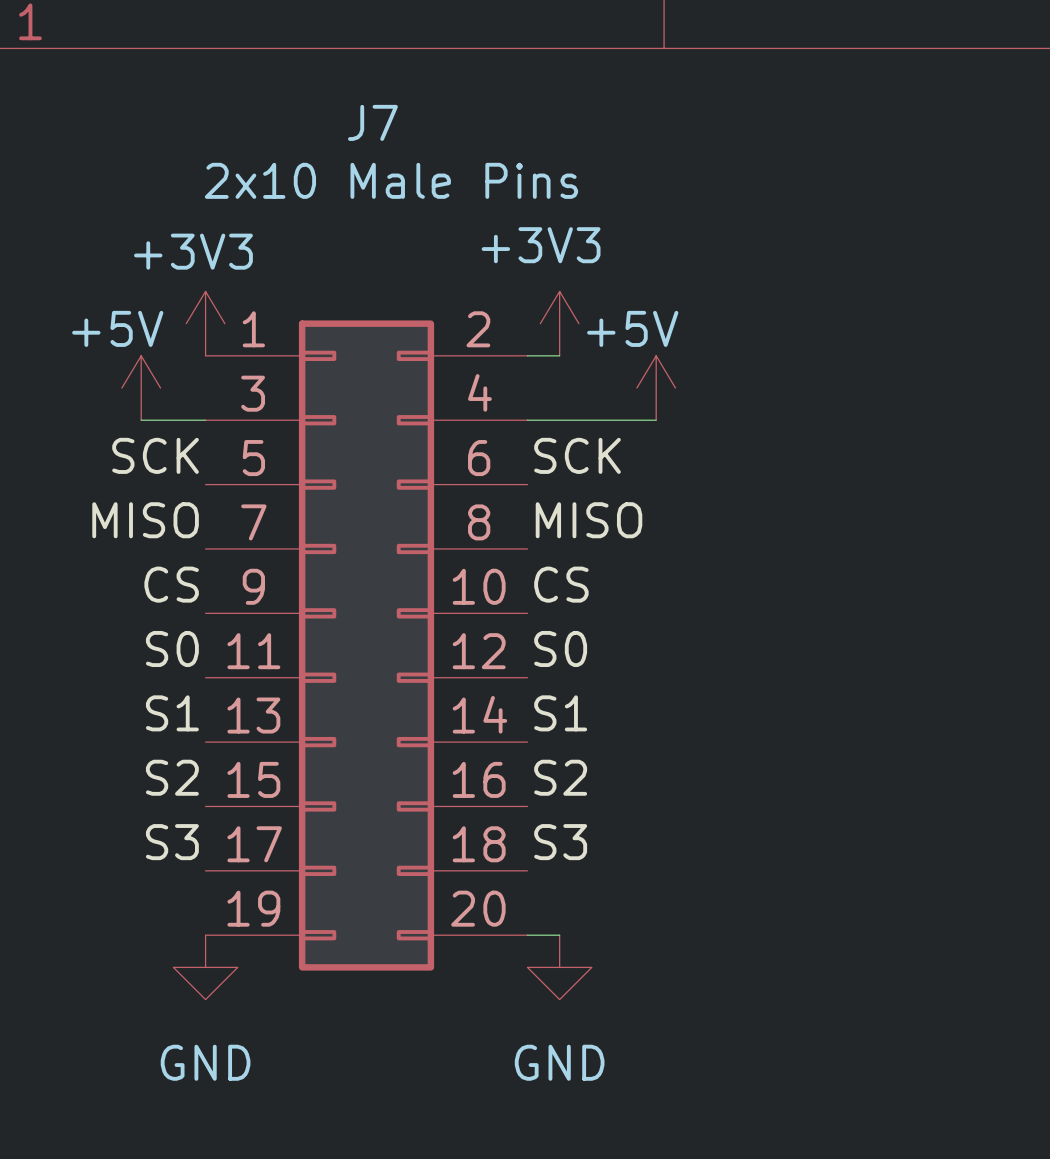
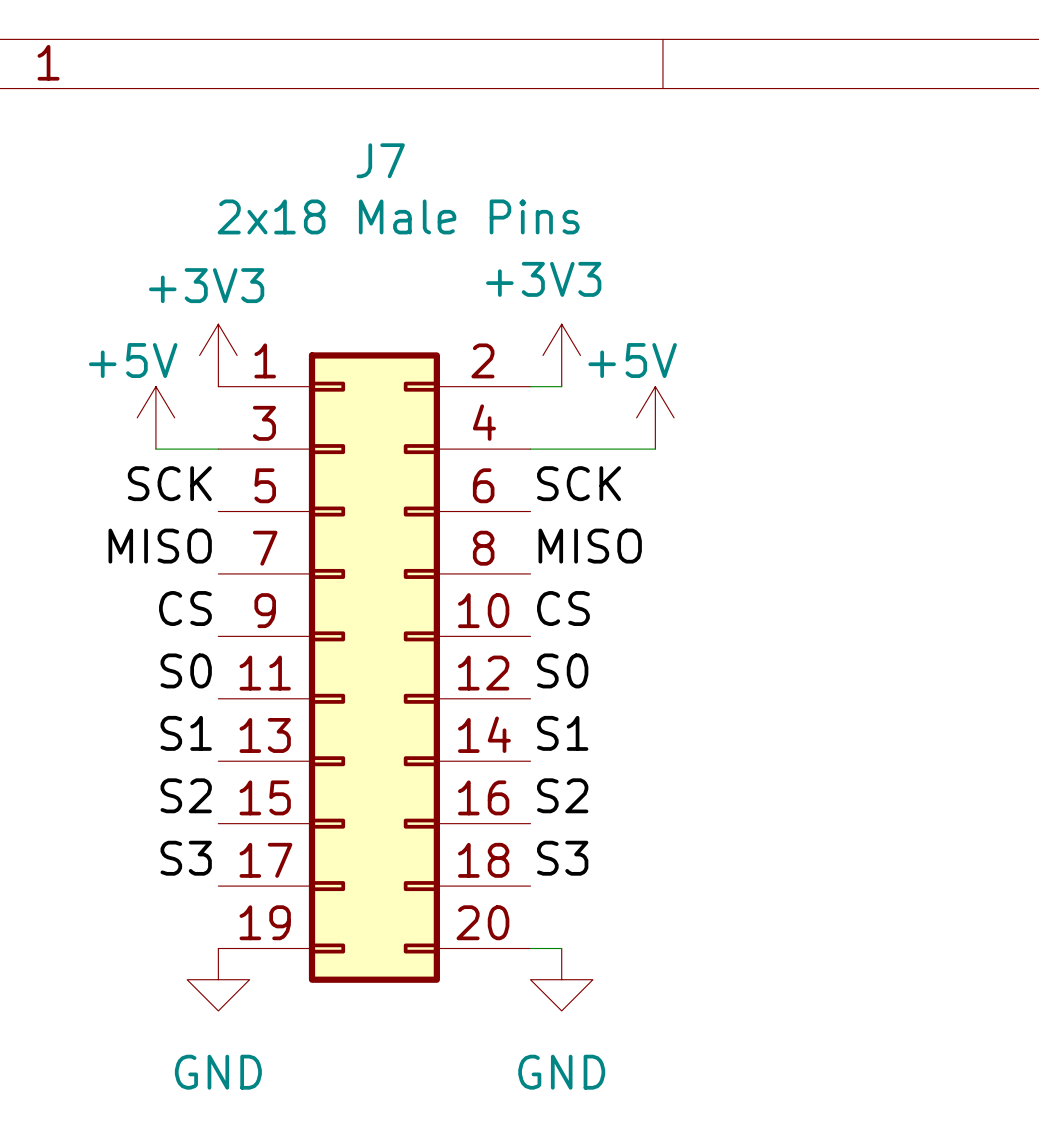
J7 value: 2x10 Male Pins (391, 180) -> 2x18 Male Pins (398, 216)

